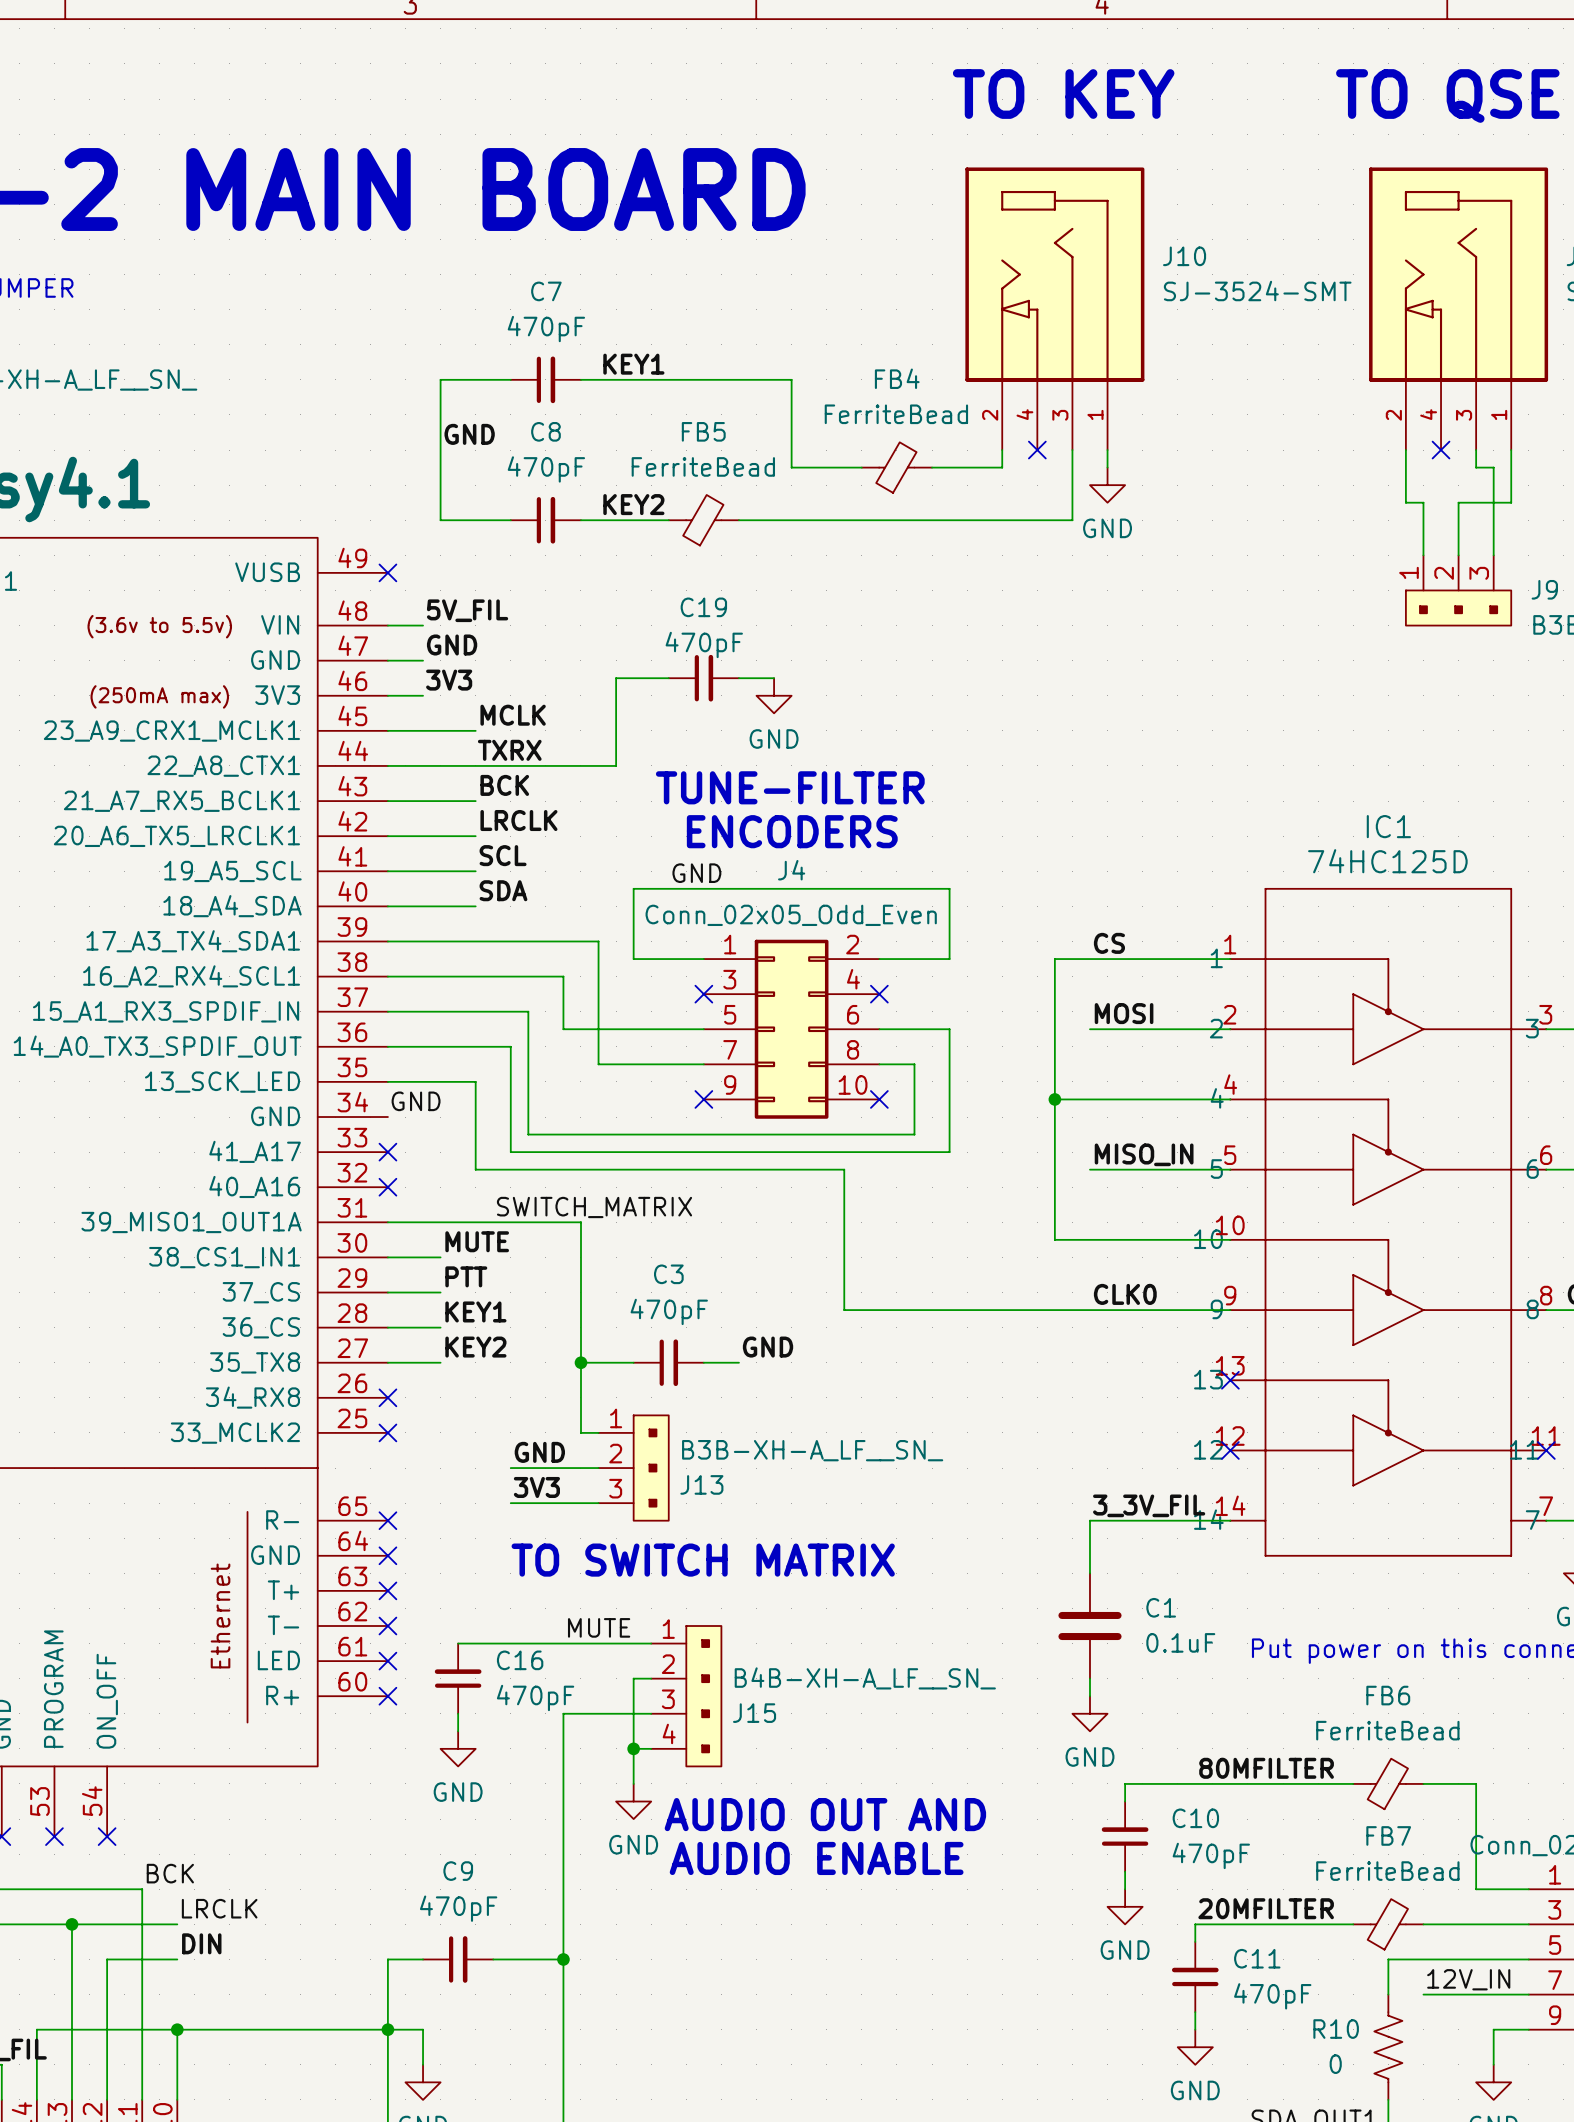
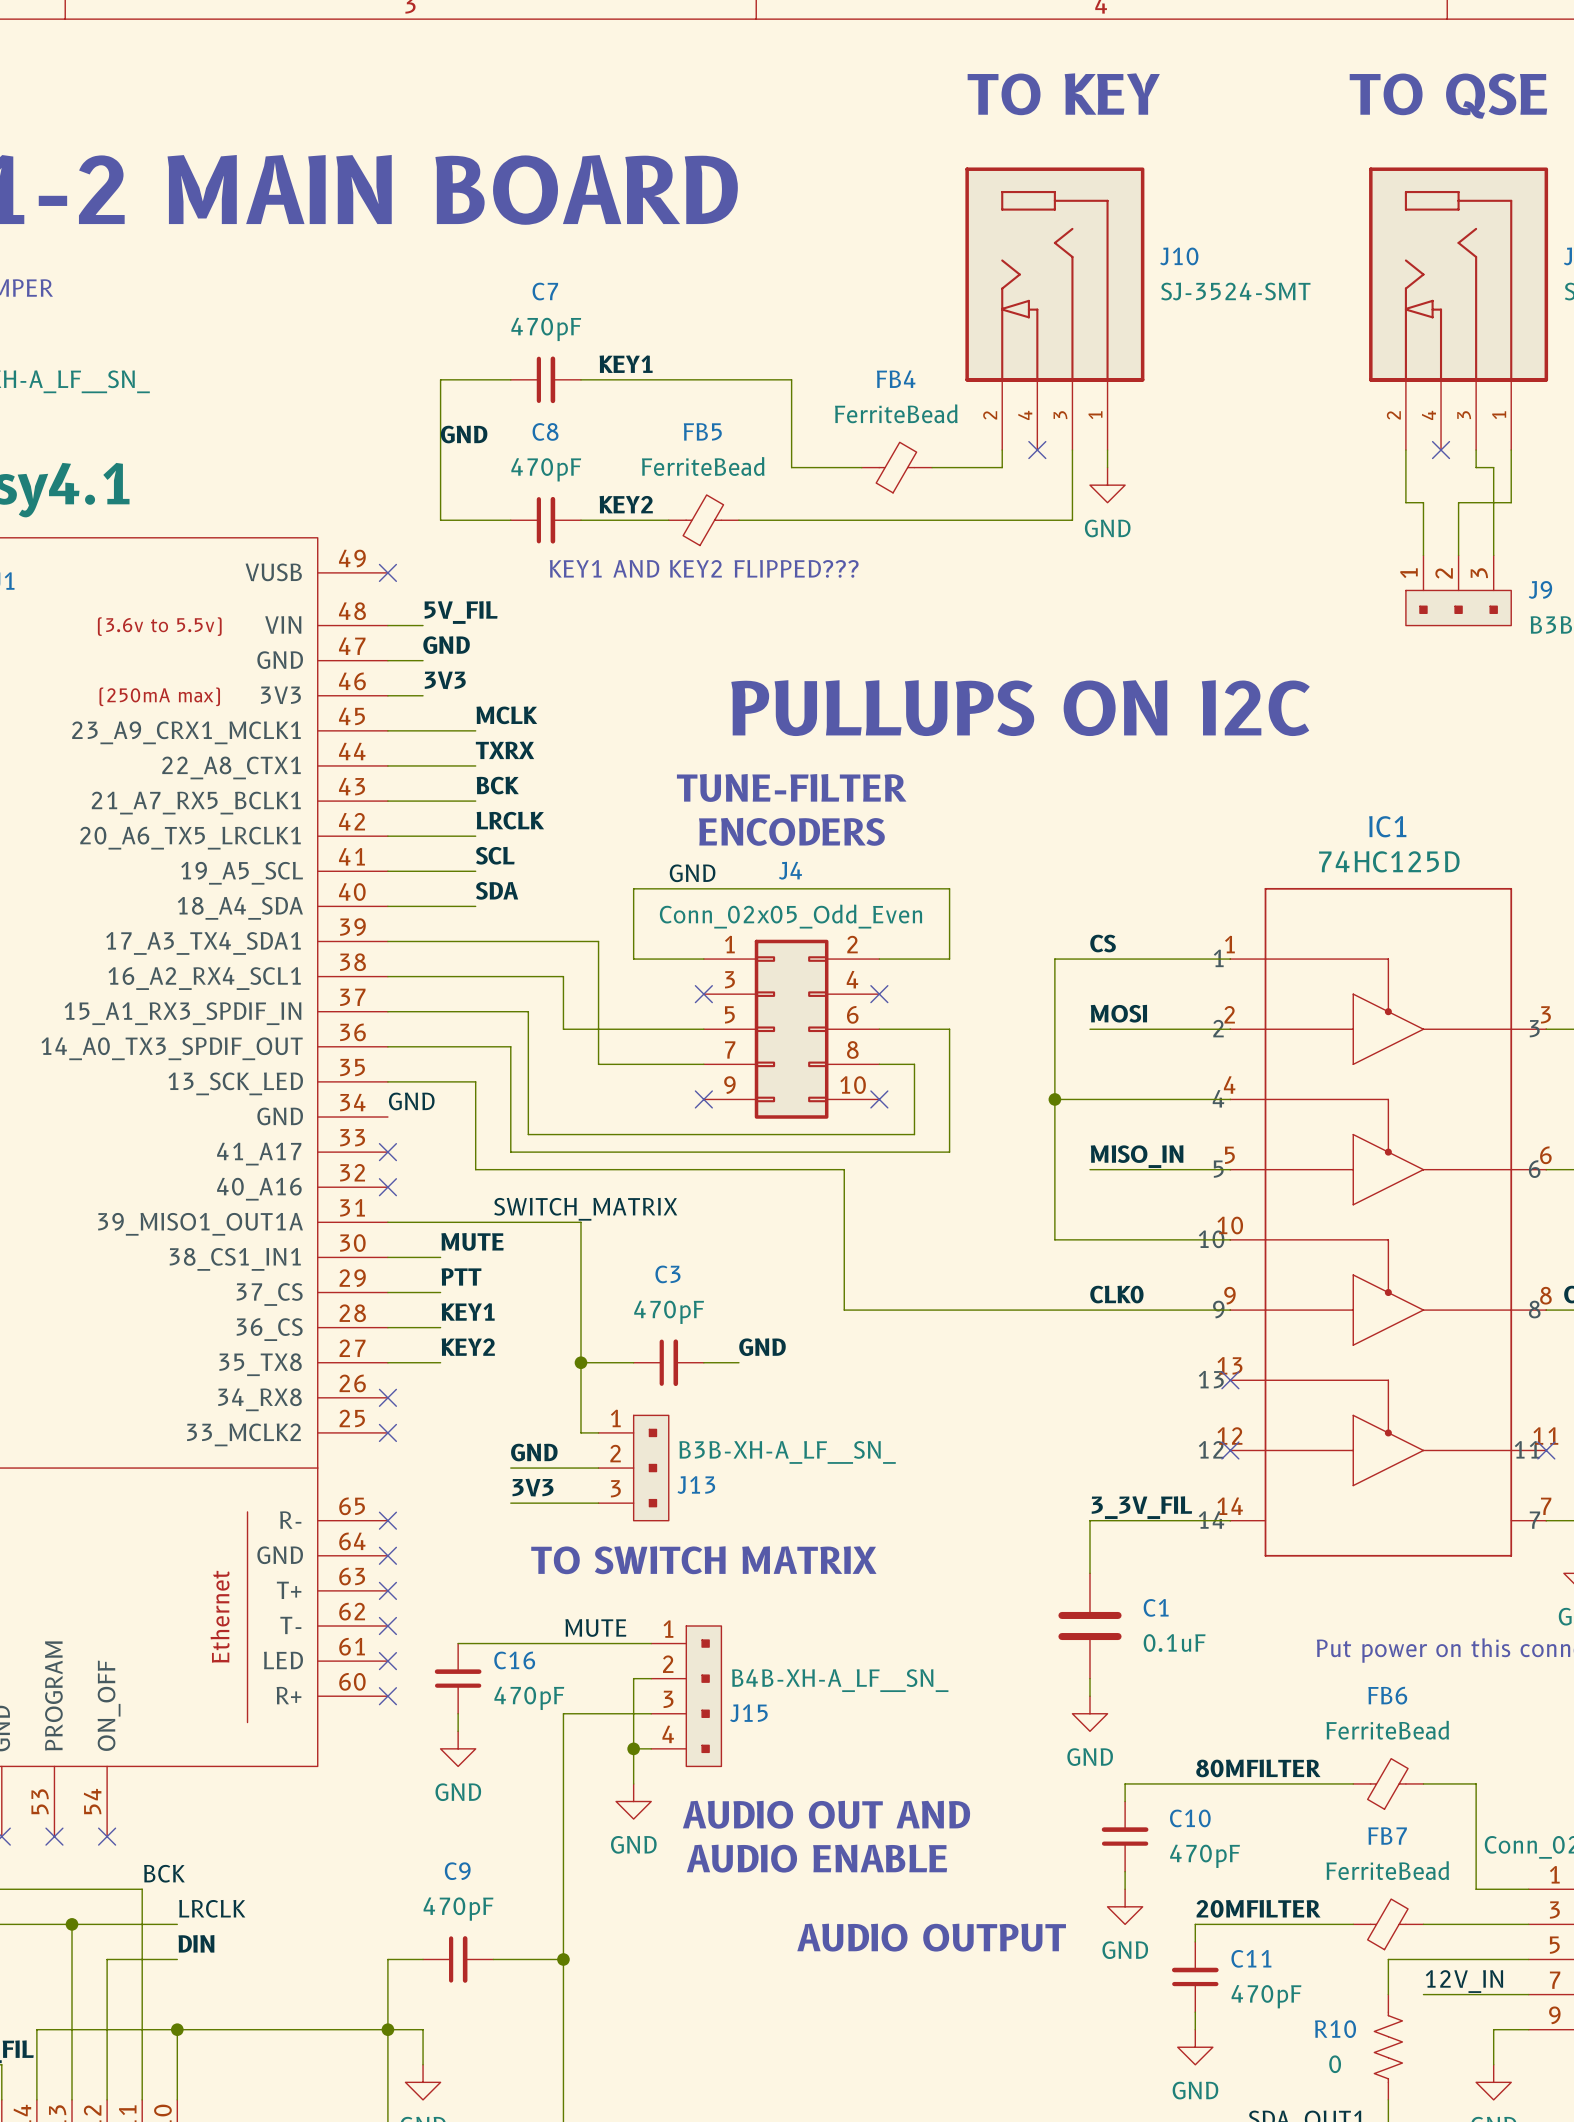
text: none -> KEY1 AND KEY2 FLIPPED??? (704, 568)
wire: (668, 678) (616, 678) (616, 765) (475, 765) -> none
C19: 470pF (703, 678) -> none
wire: (738, 678) (774, 678) -> none
power symbol: GND (774, 695) -> none
text: none -> PULLUPS ON I2C (1020, 708)
text: none -> AUDIO OUTPUT (931, 1937)

